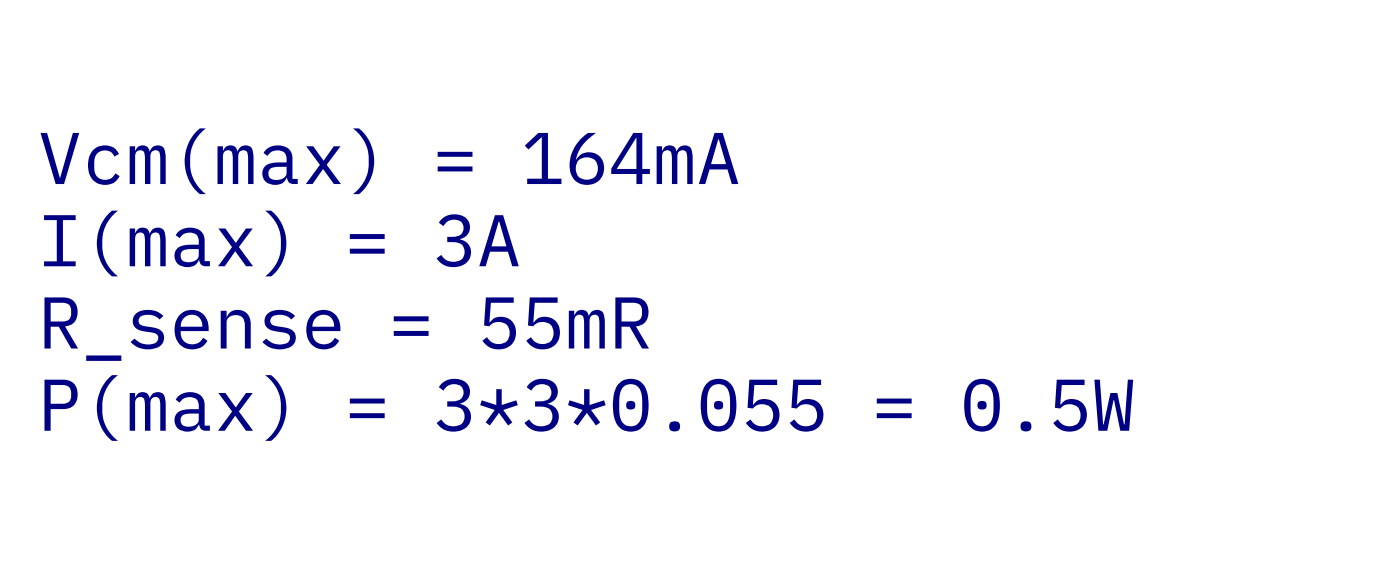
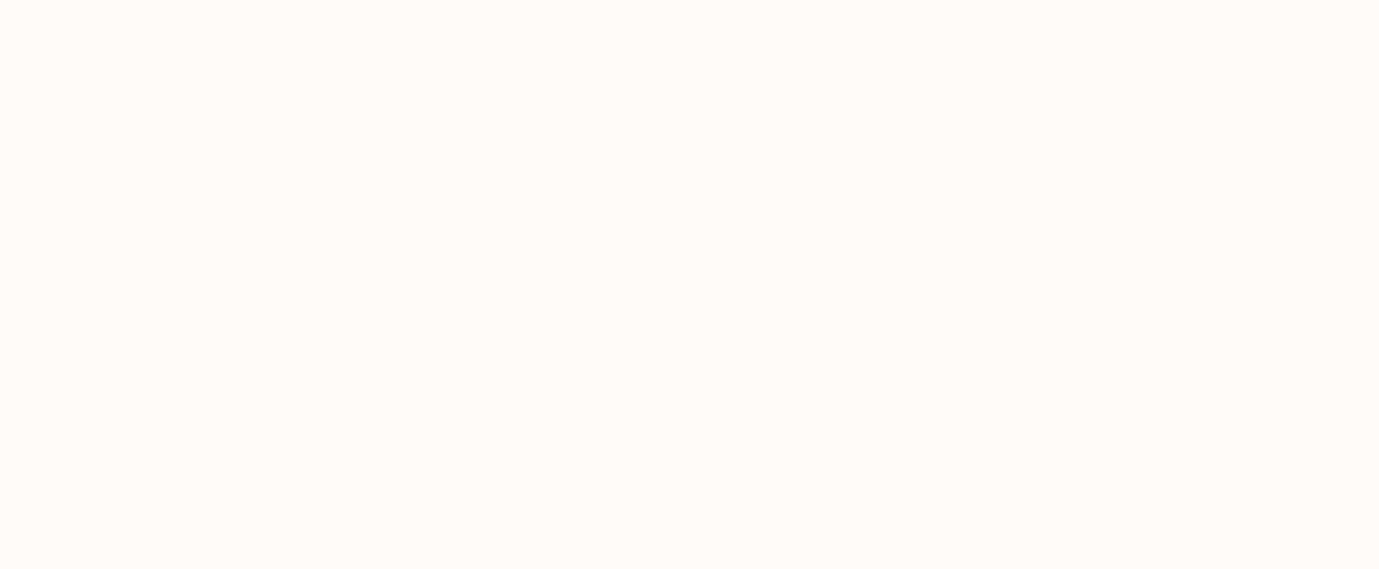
text: Vcm(max) = 164mA (389, 161) -> none
text: I(max) = 3A (281, 243) -> none
text: R_sense = 55mR (346, 329) -> none
text: P(max) = 3*3*0.055 = 0.5W (588, 408) -> none

